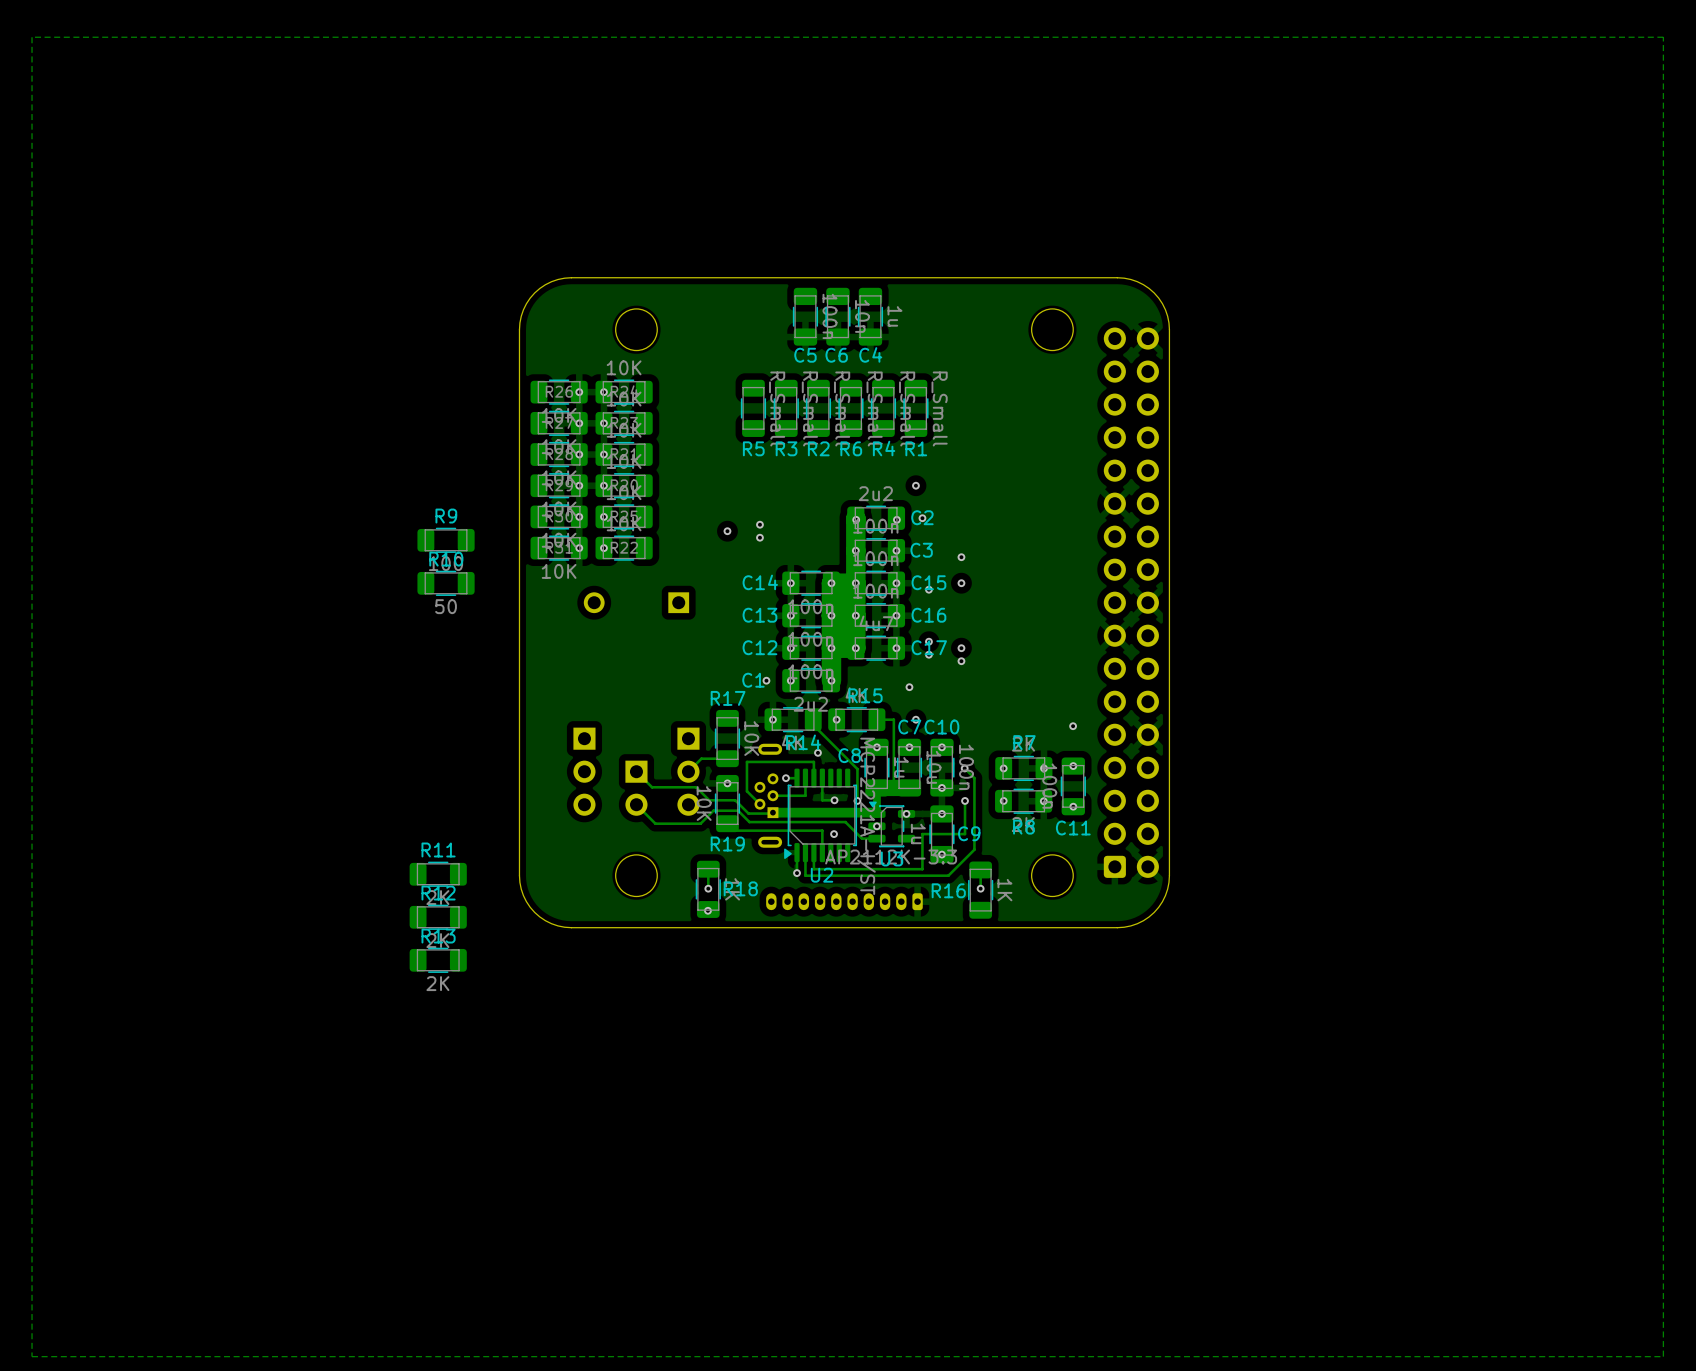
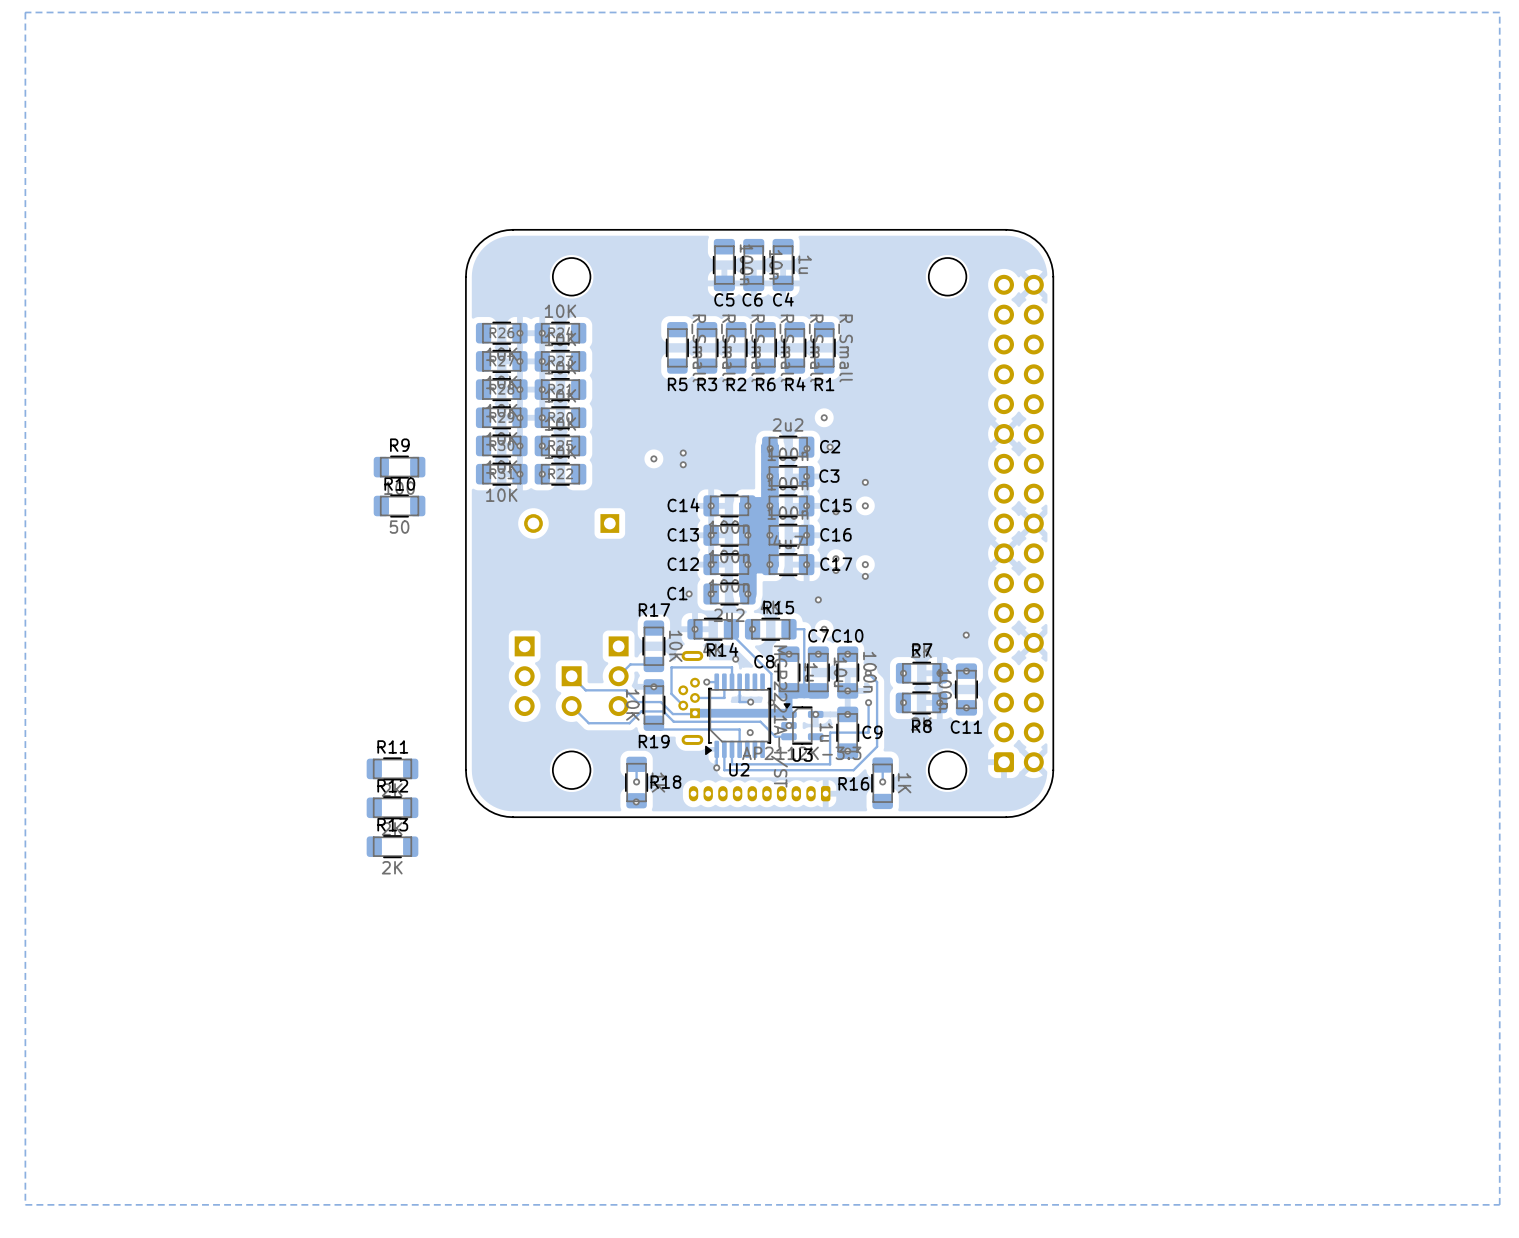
U3 footprint: [868, 801, 916, 848] -> [781, 703, 824, 745]

